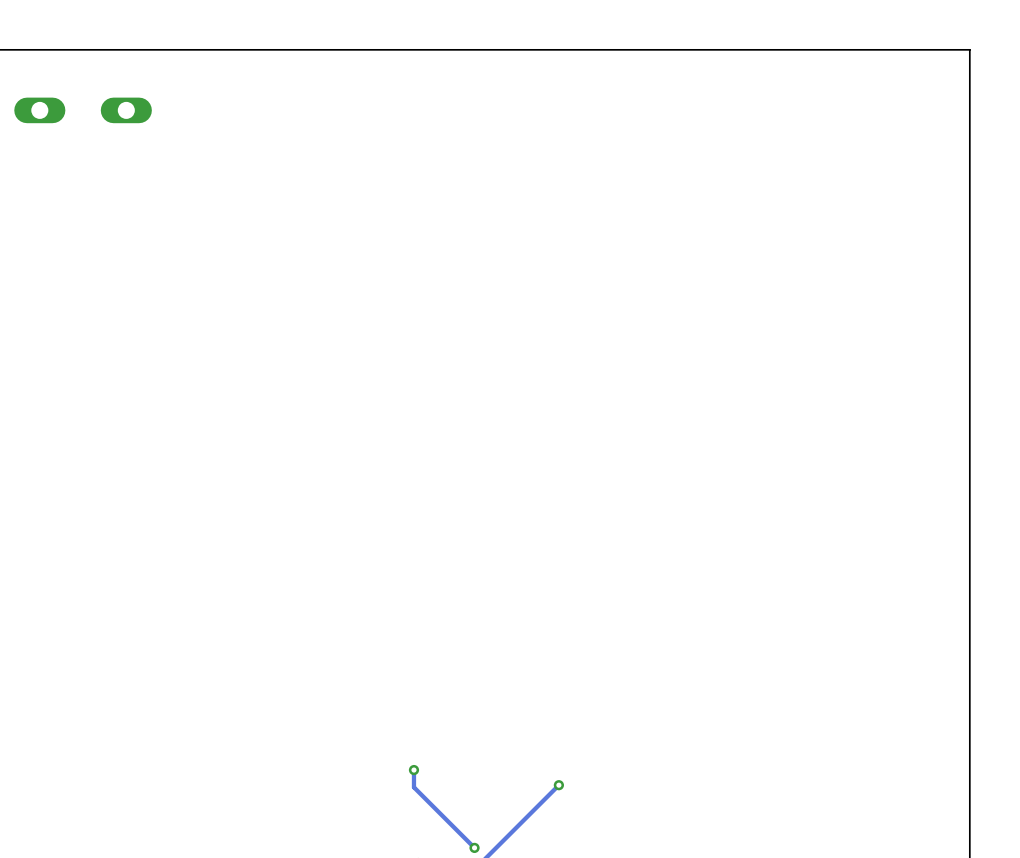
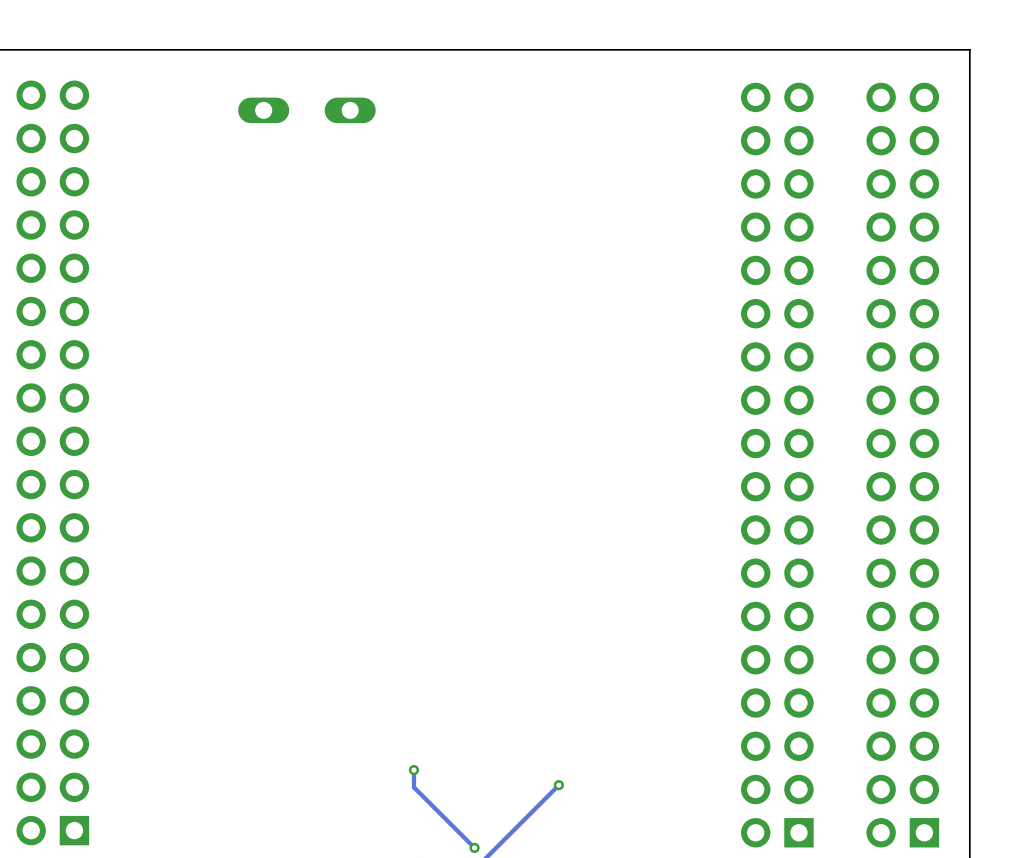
part position: (83, 110) -> (306, 110)
part: none -> (52, 462)
part: none -> (777, 465)
part: none -> (902, 465)

